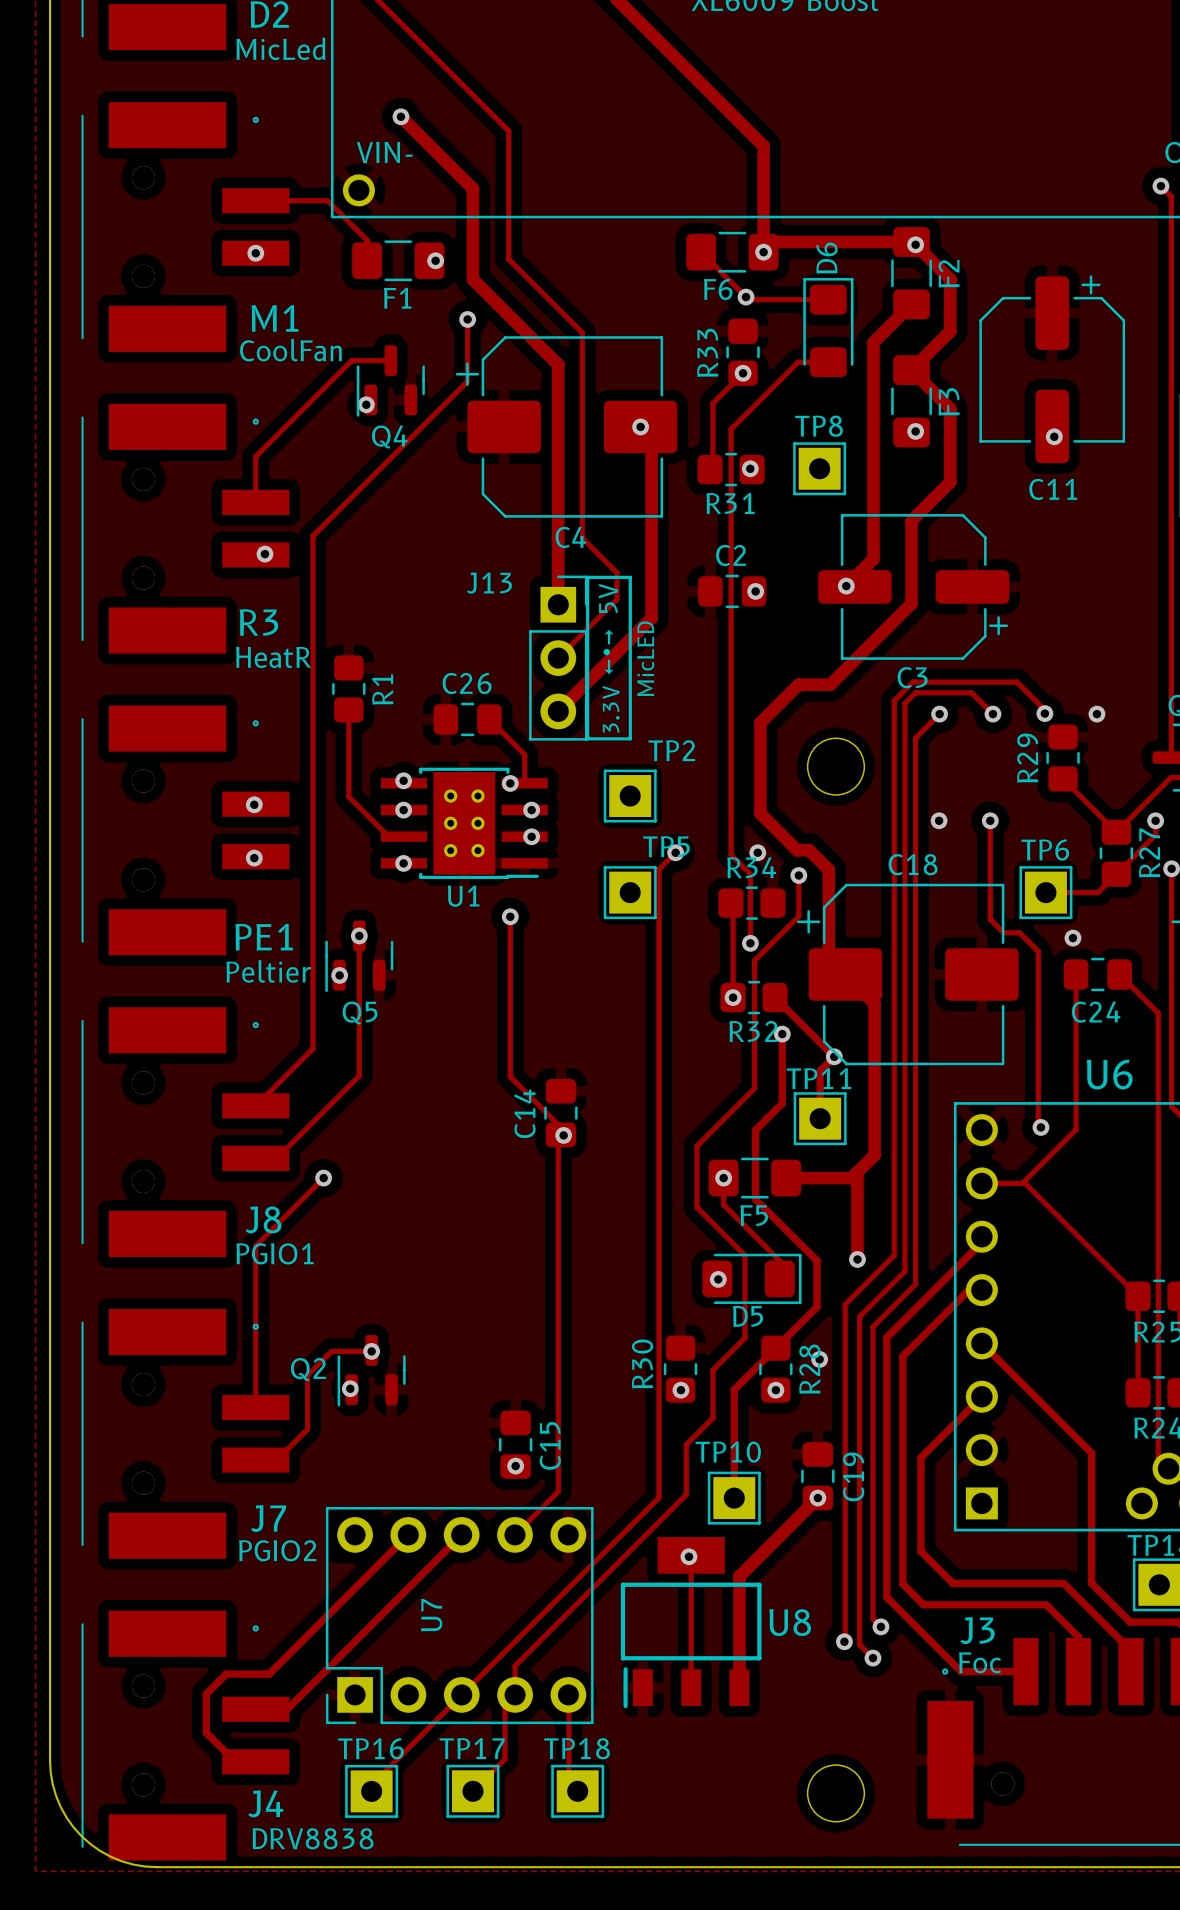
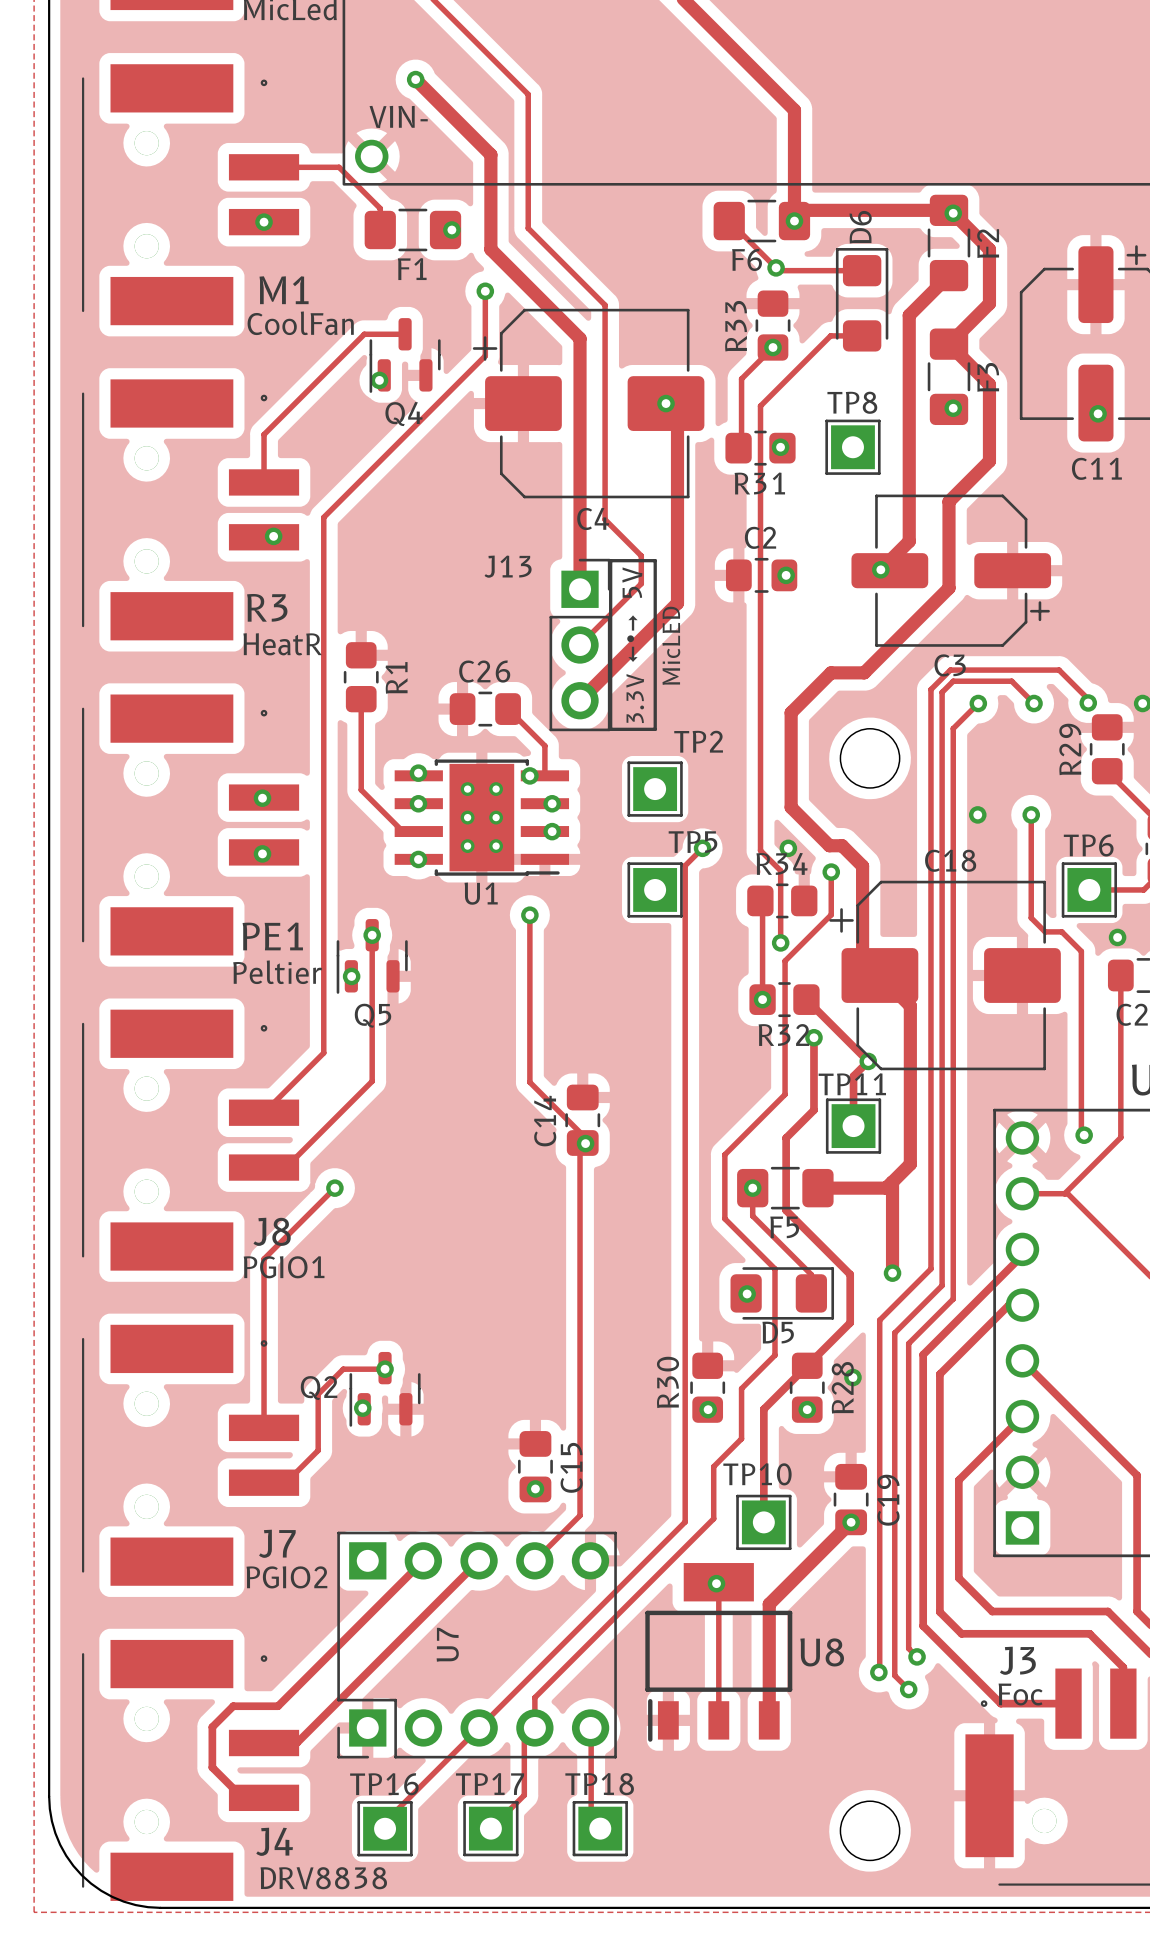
U7 footprint: [325, 1506, 594, 1725] -> [337, 1531, 617, 1759]

